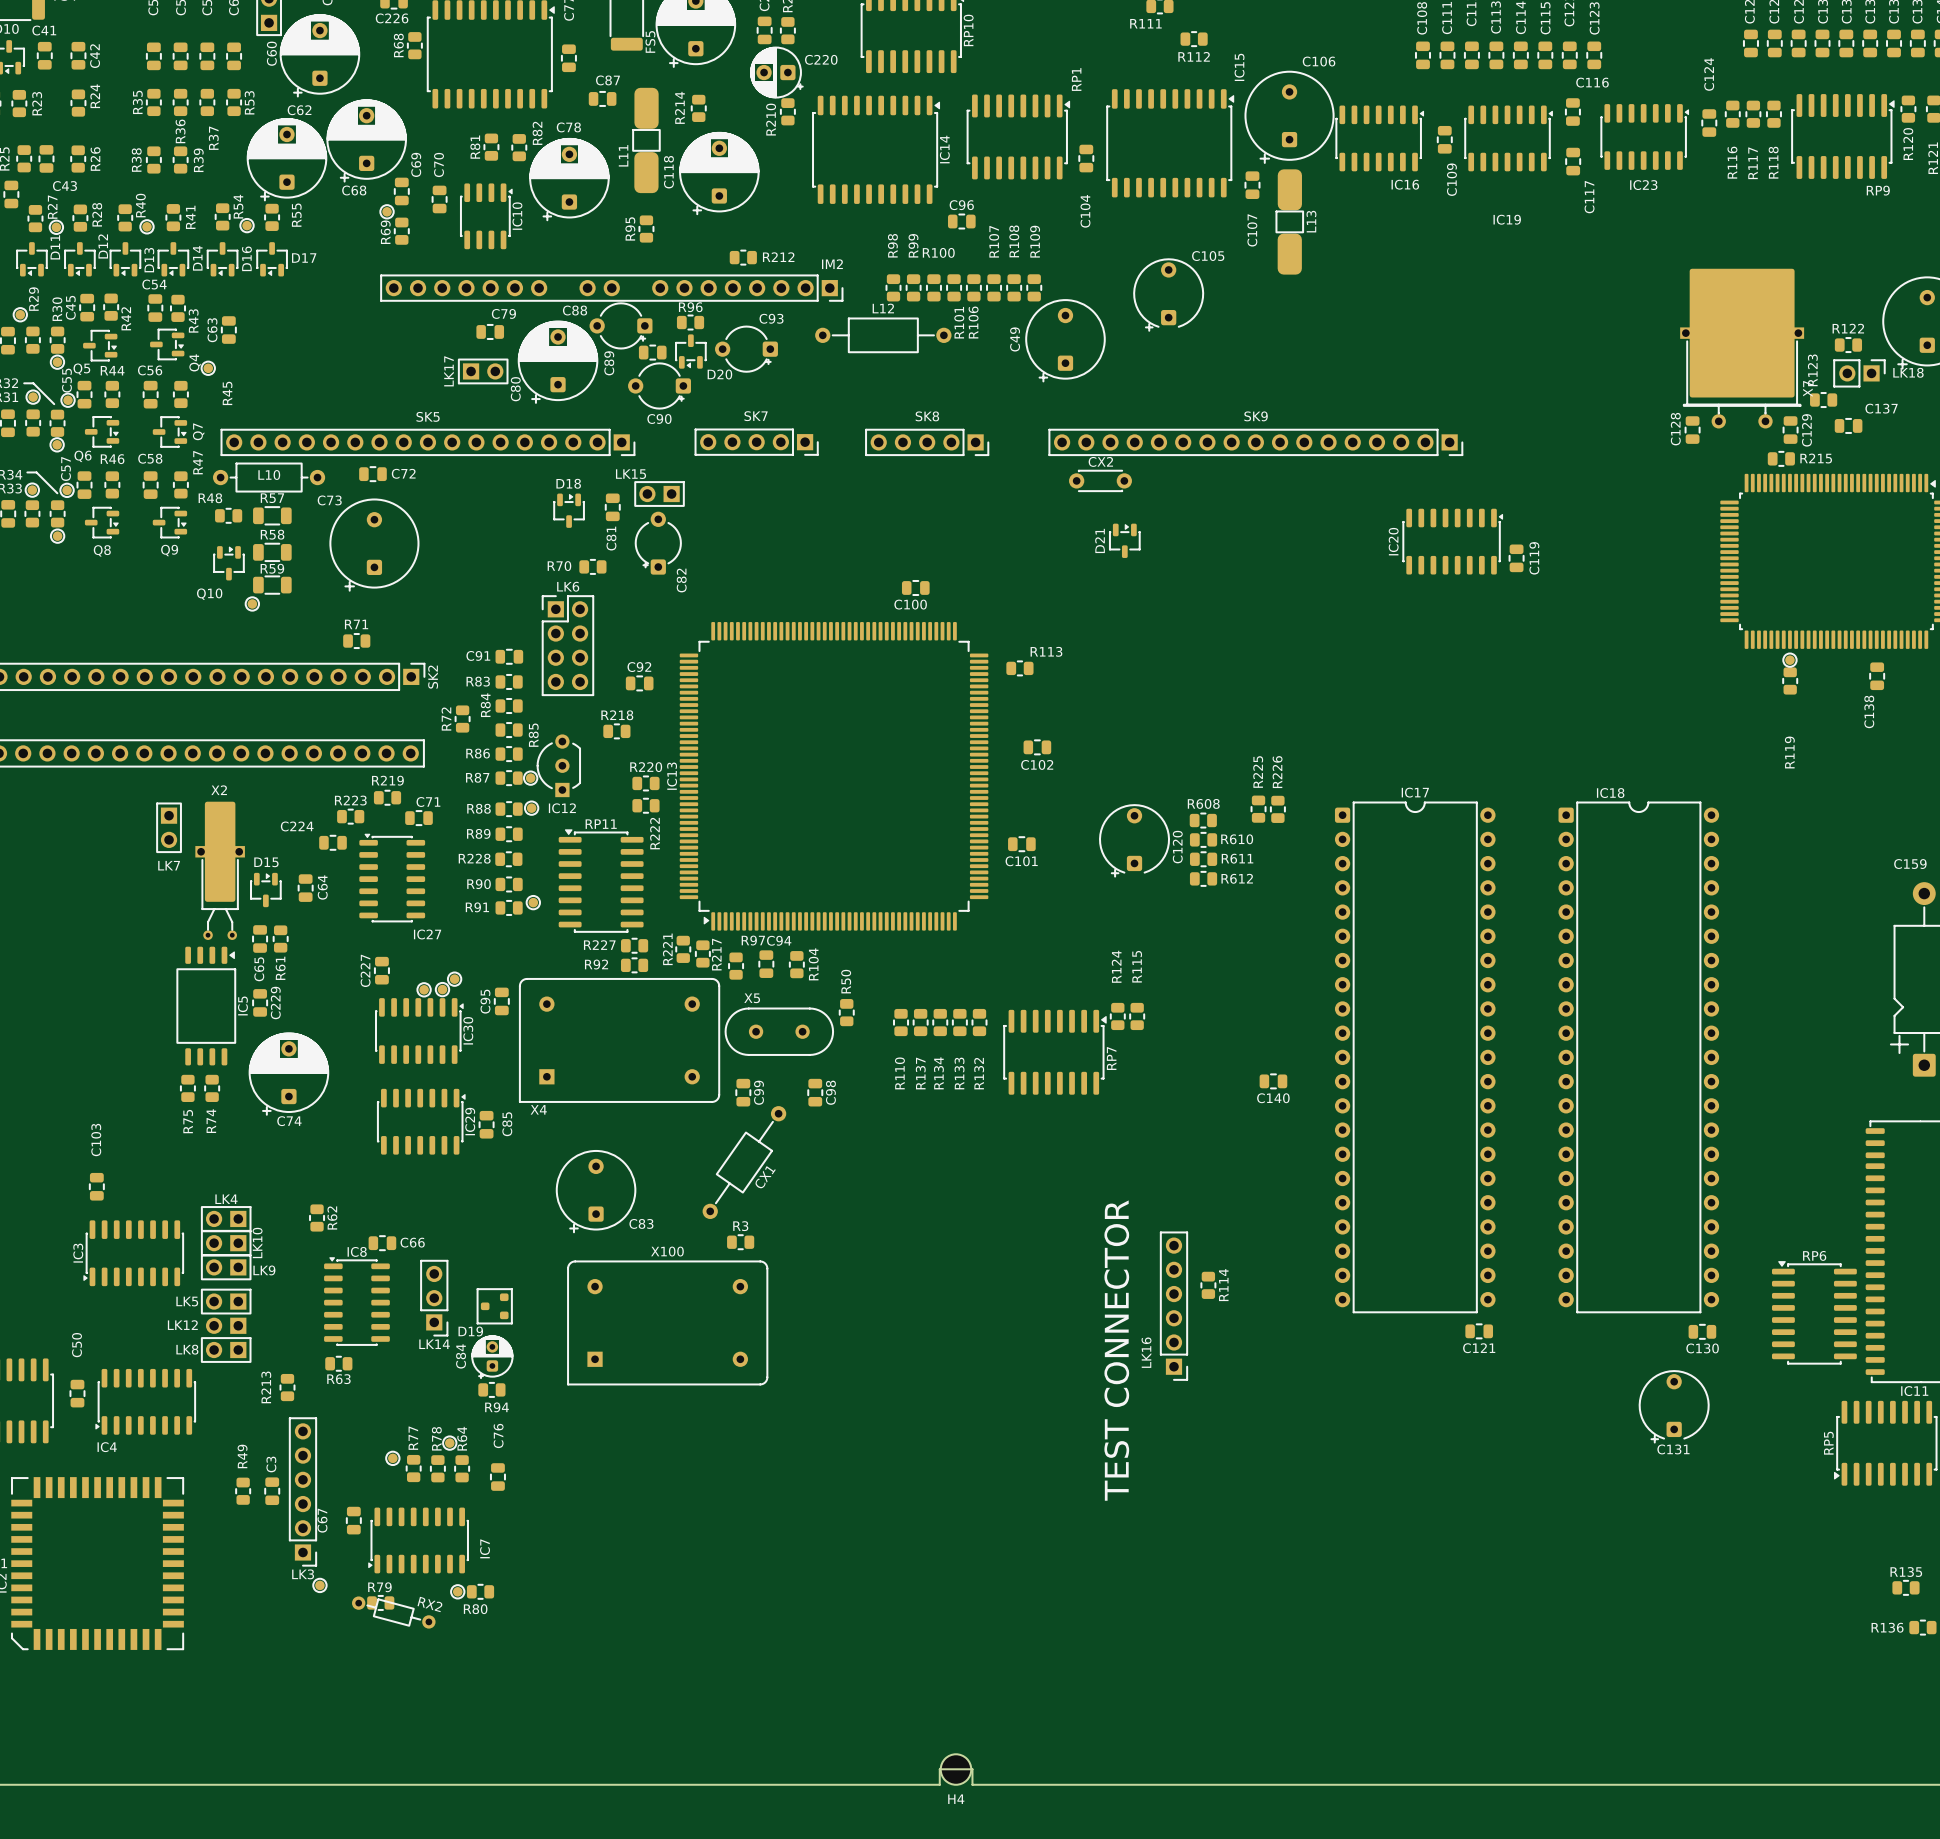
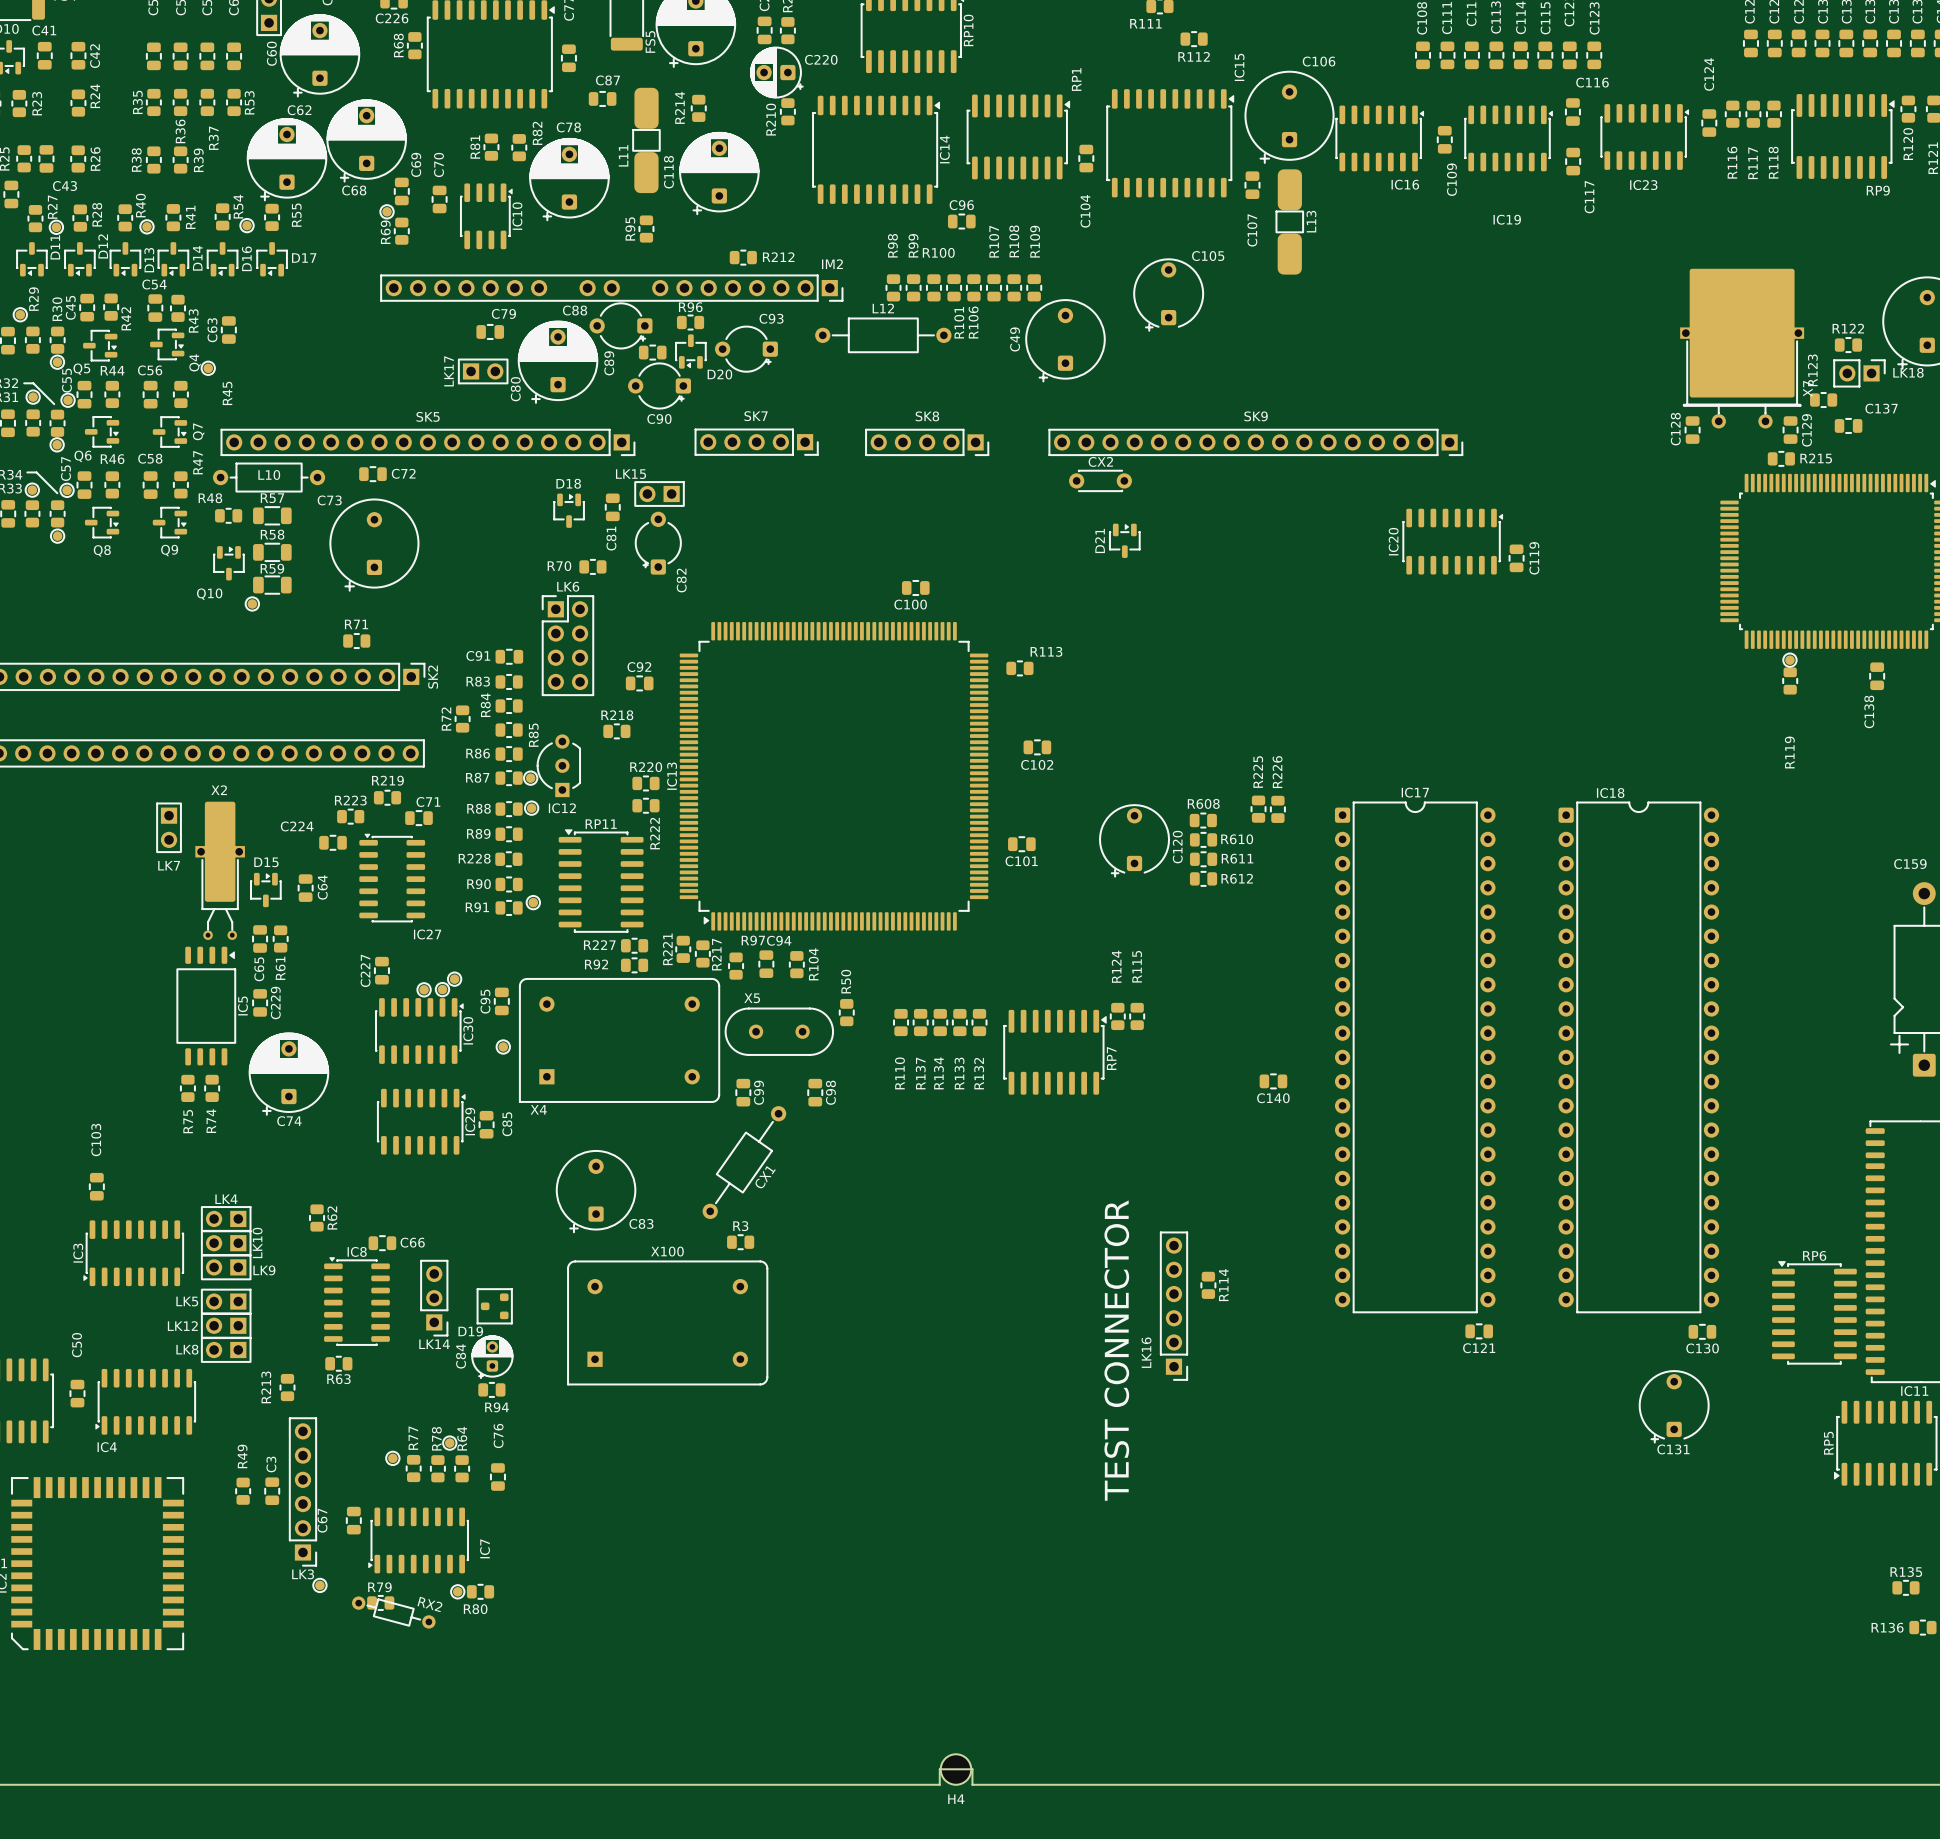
part: none -> (503, 1046)
LK12 side: bottom (226, 1325) -> top (226, 1325)

